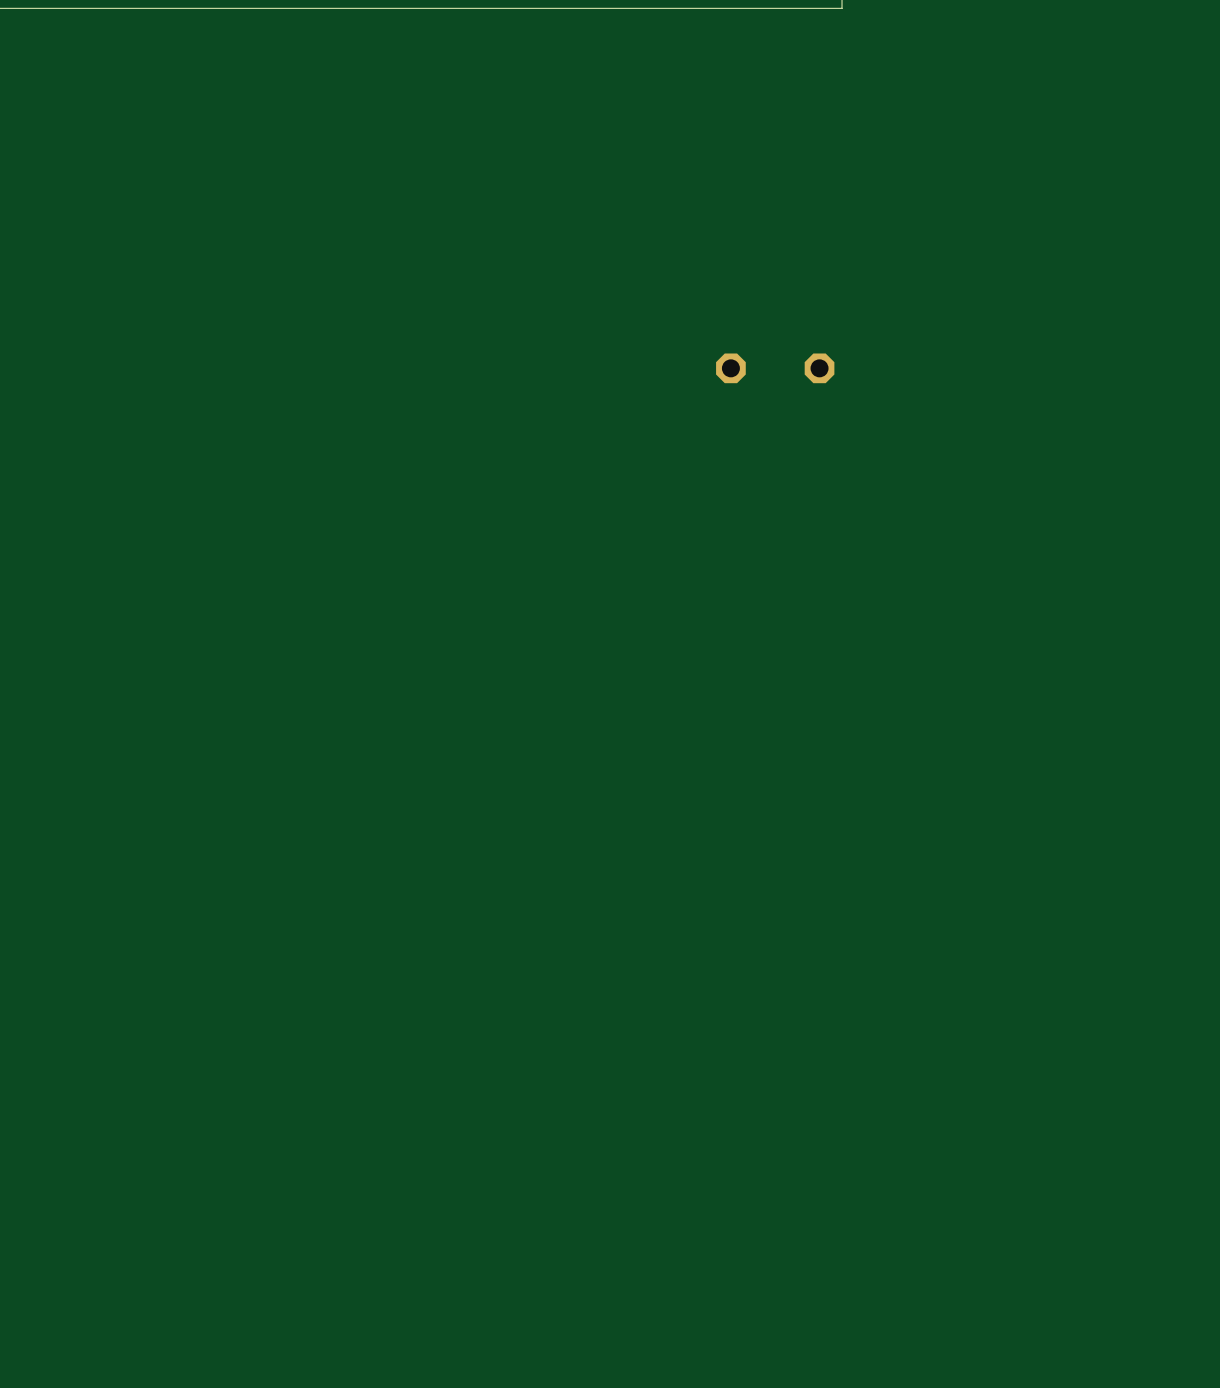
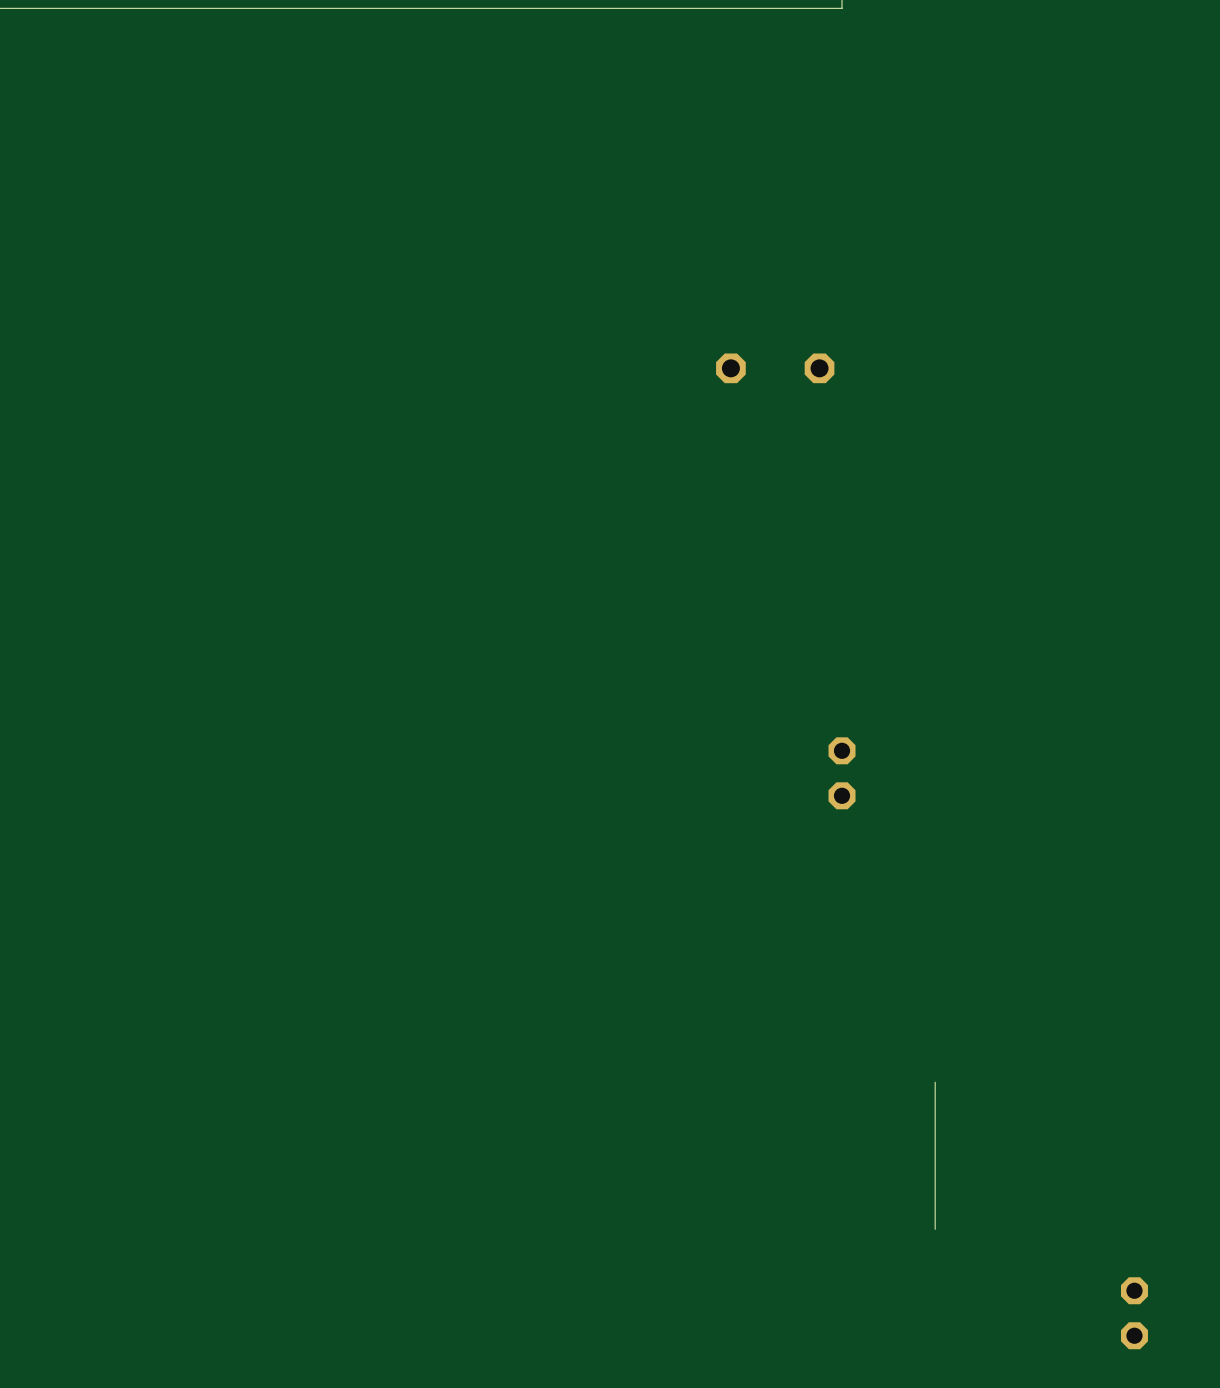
part: none -> (842, 773)
part: none -> (935, 1155)
part: none -> (1134, 1313)

